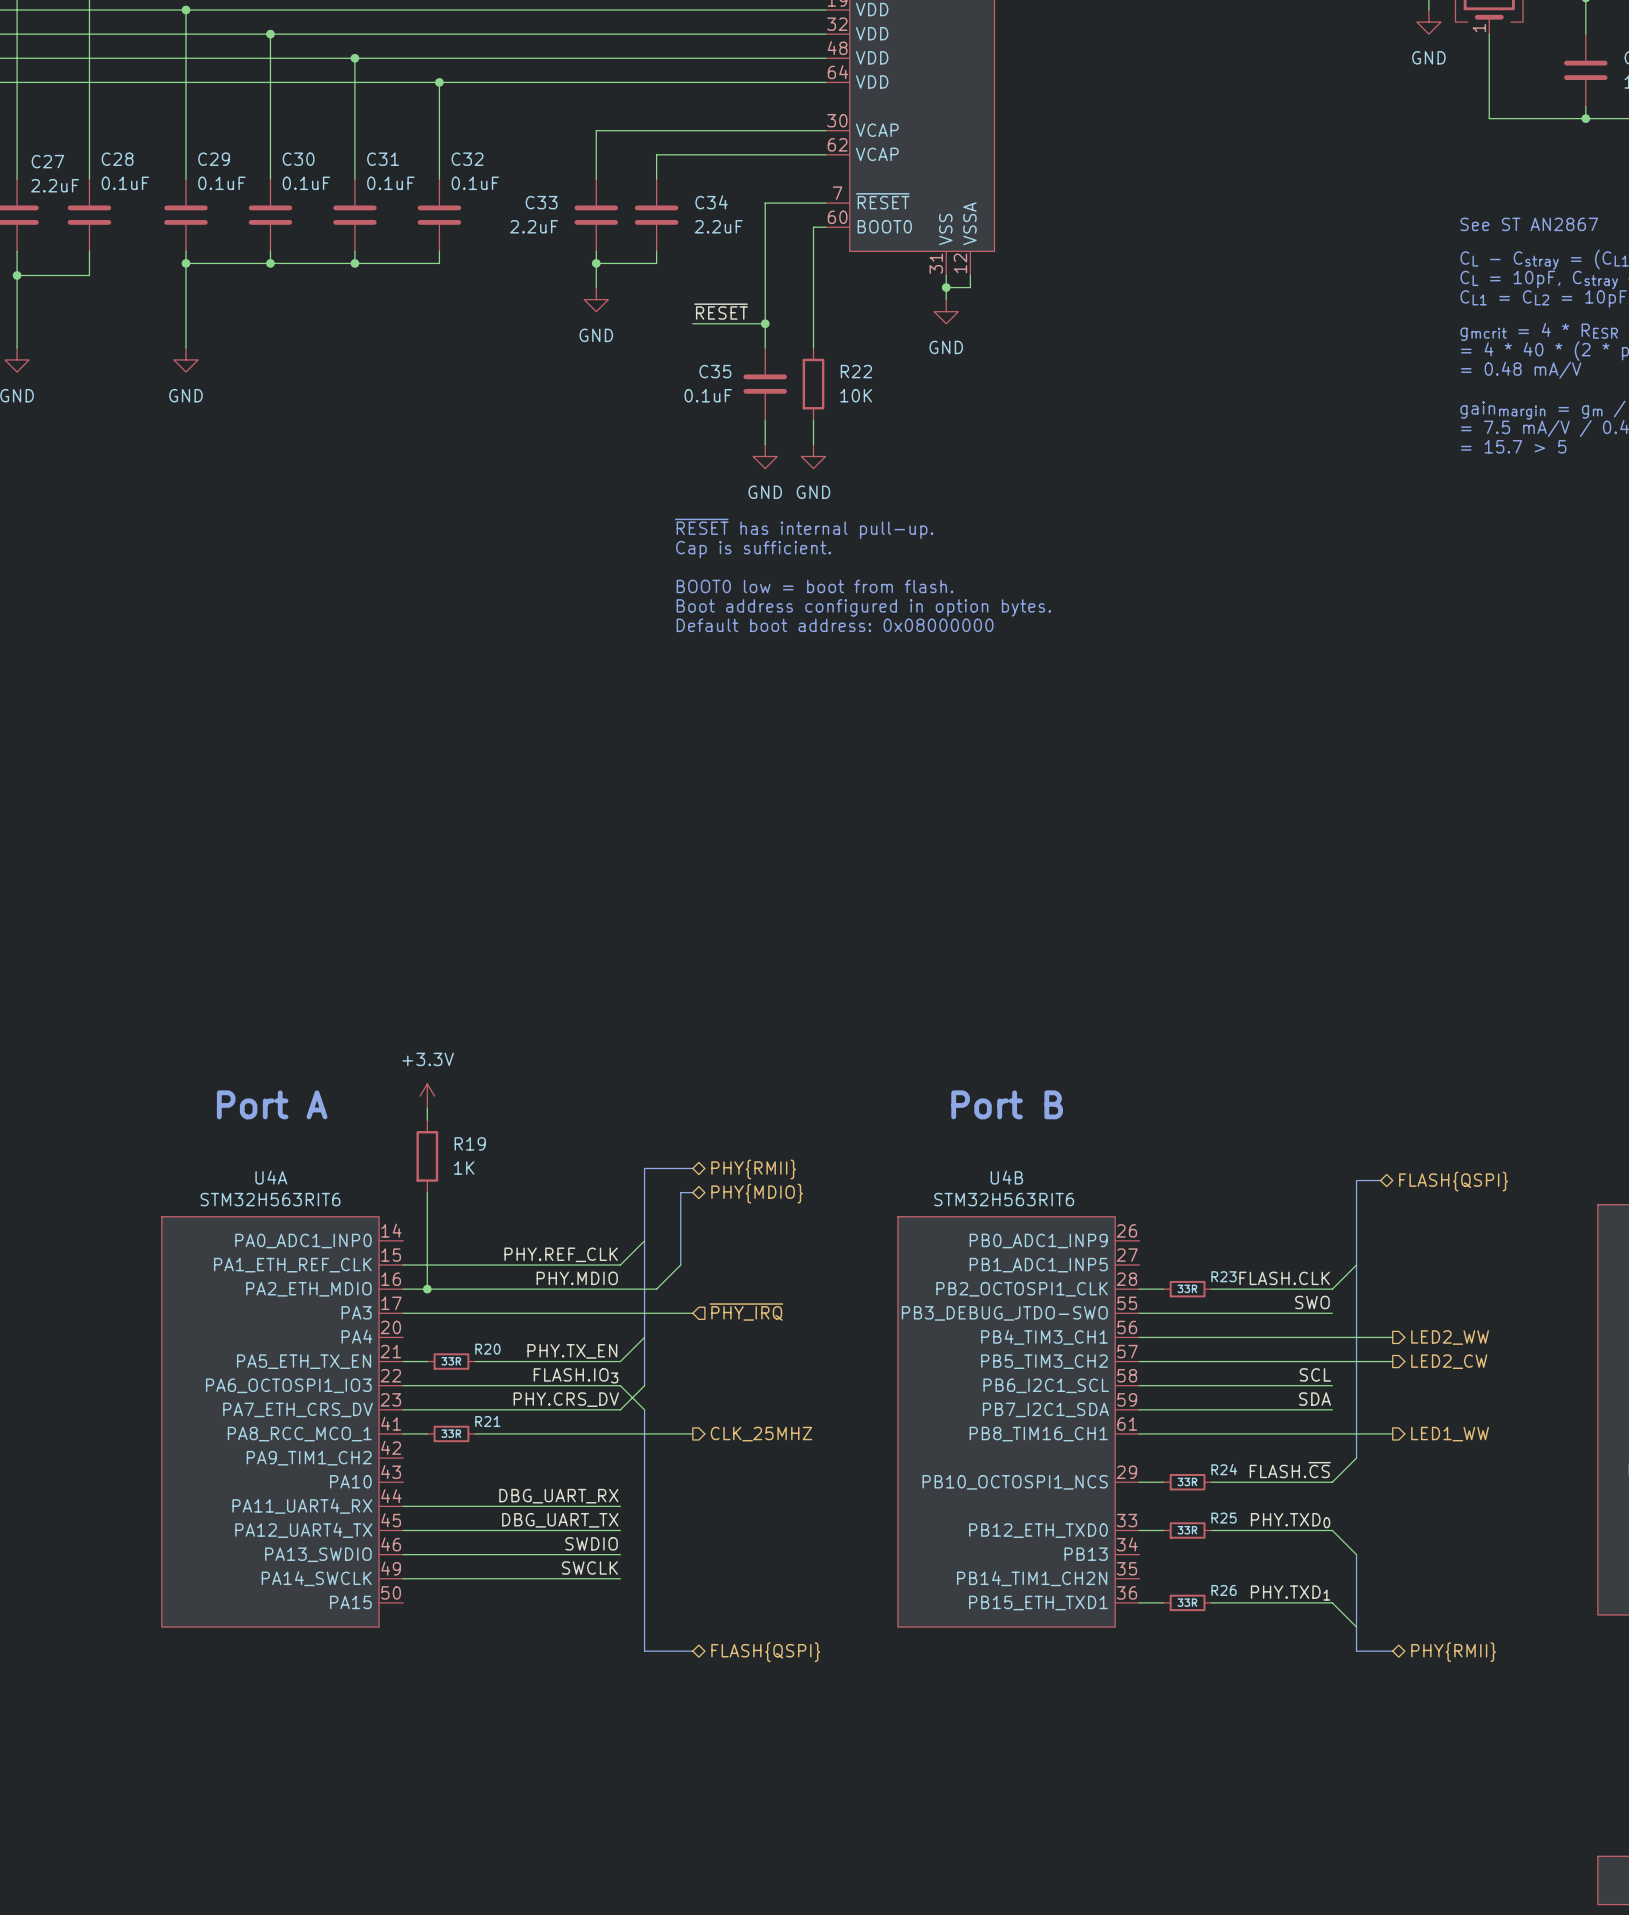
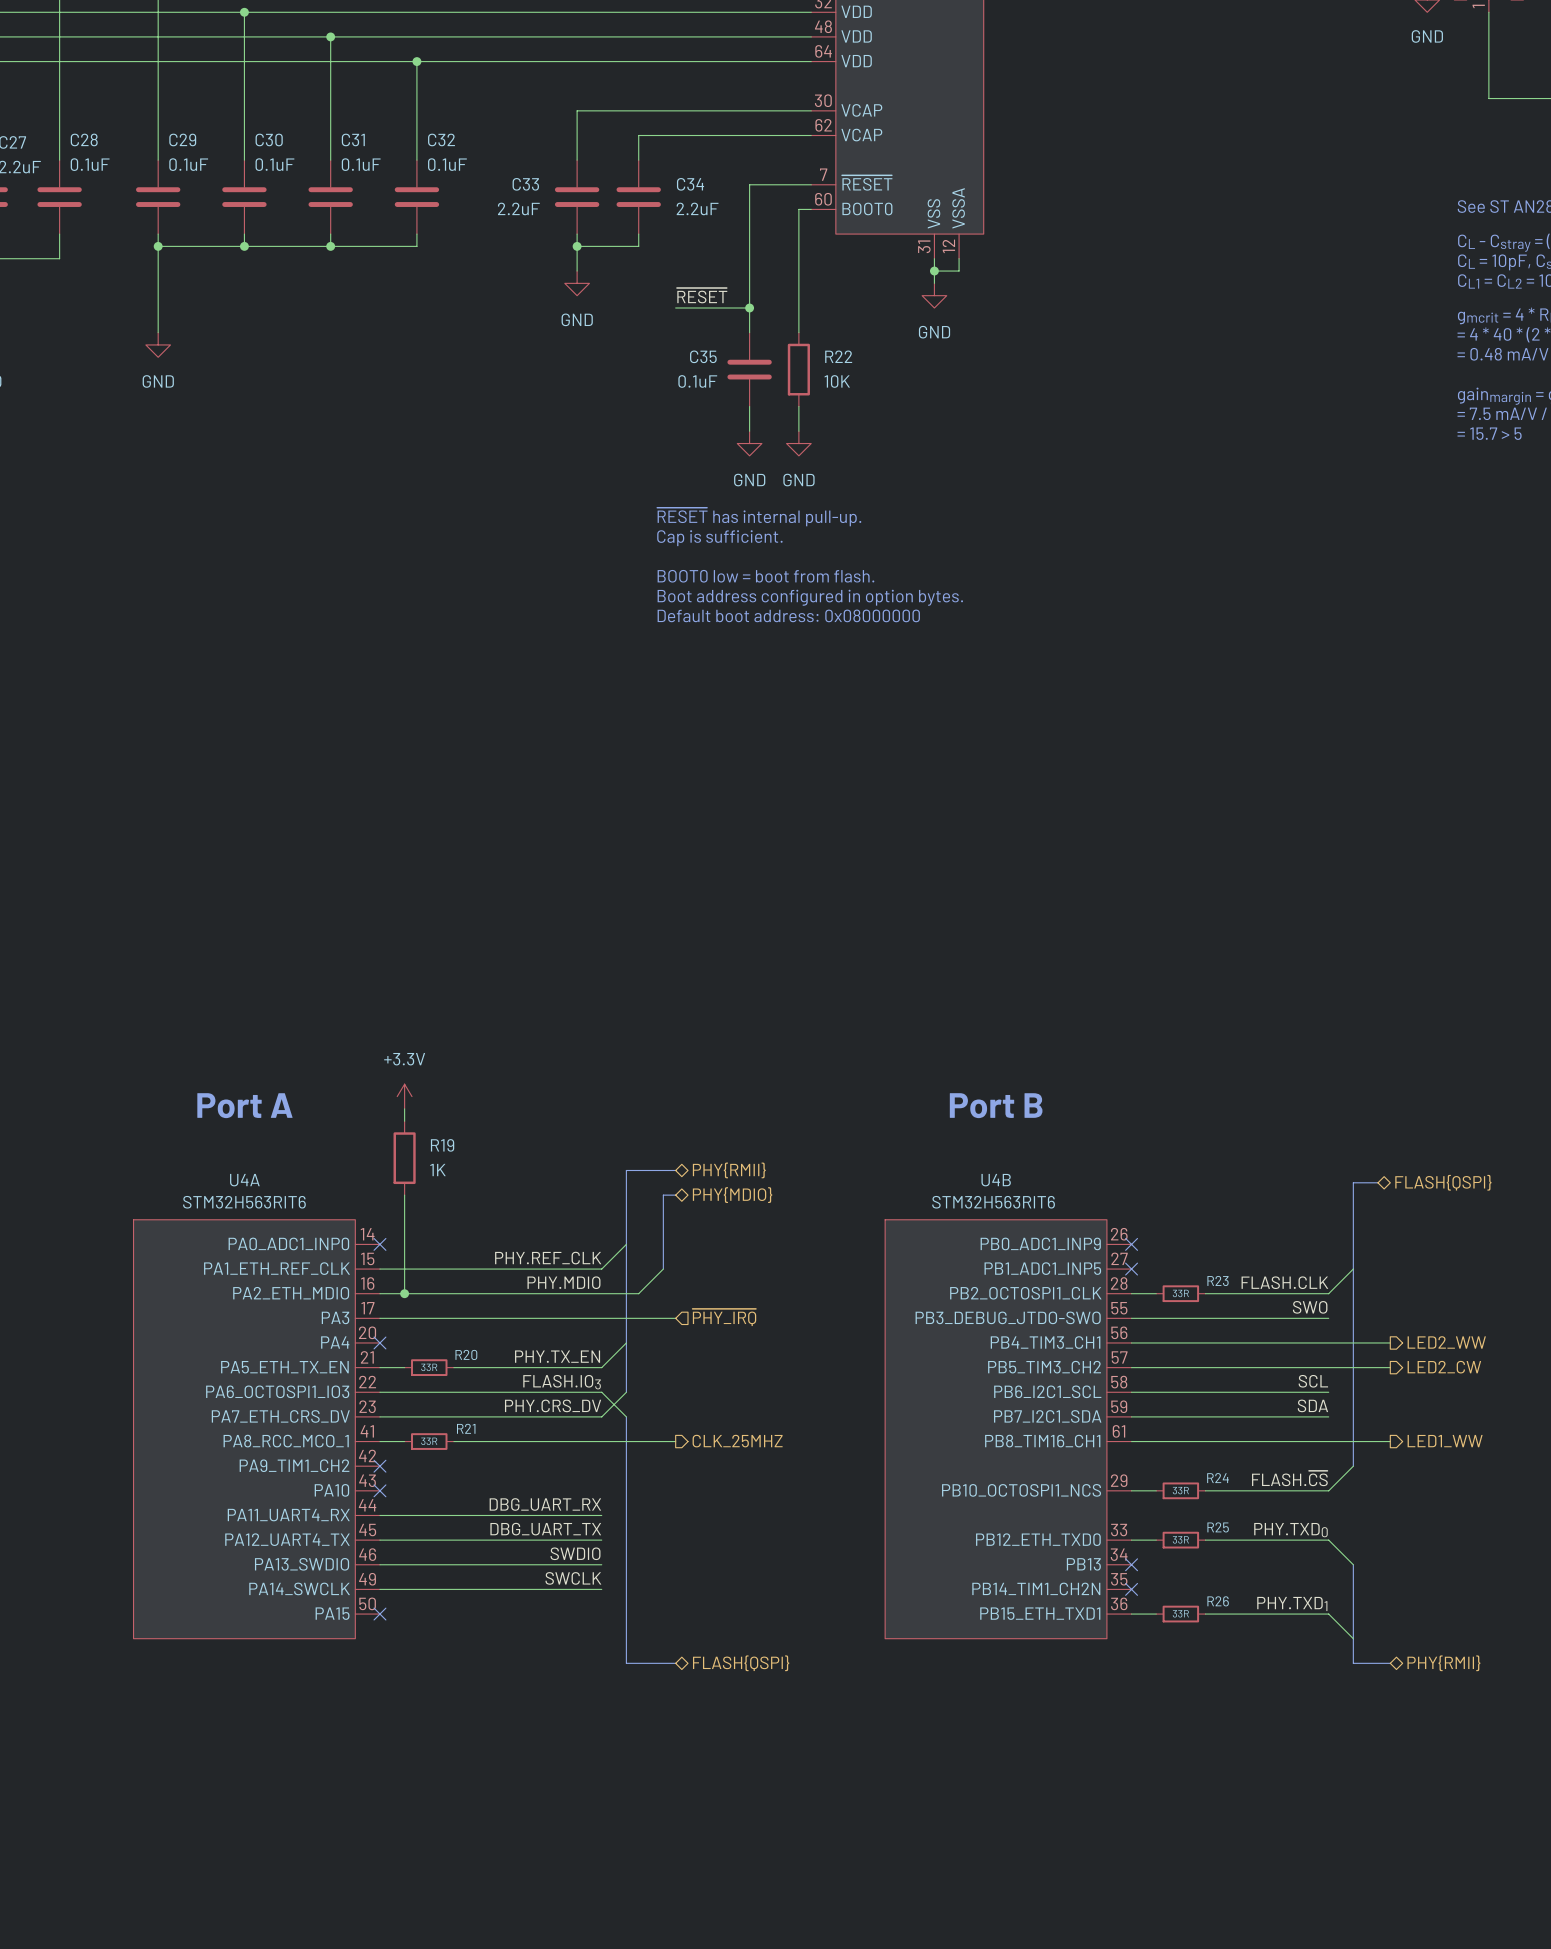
no-connect mark: none -> (379, 1244)
no-connect mark: none -> (1131, 1244)
no-connect mark: none -> (1131, 1269)
no-connect mark: none -> (379, 1342)
no-connect mark: none -> (379, 1466)
no-connect mark: none -> (379, 1490)
no-connect mark: none -> (1131, 1564)
no-connect mark: none -> (1131, 1589)
no-connect mark: none -> (379, 1614)

